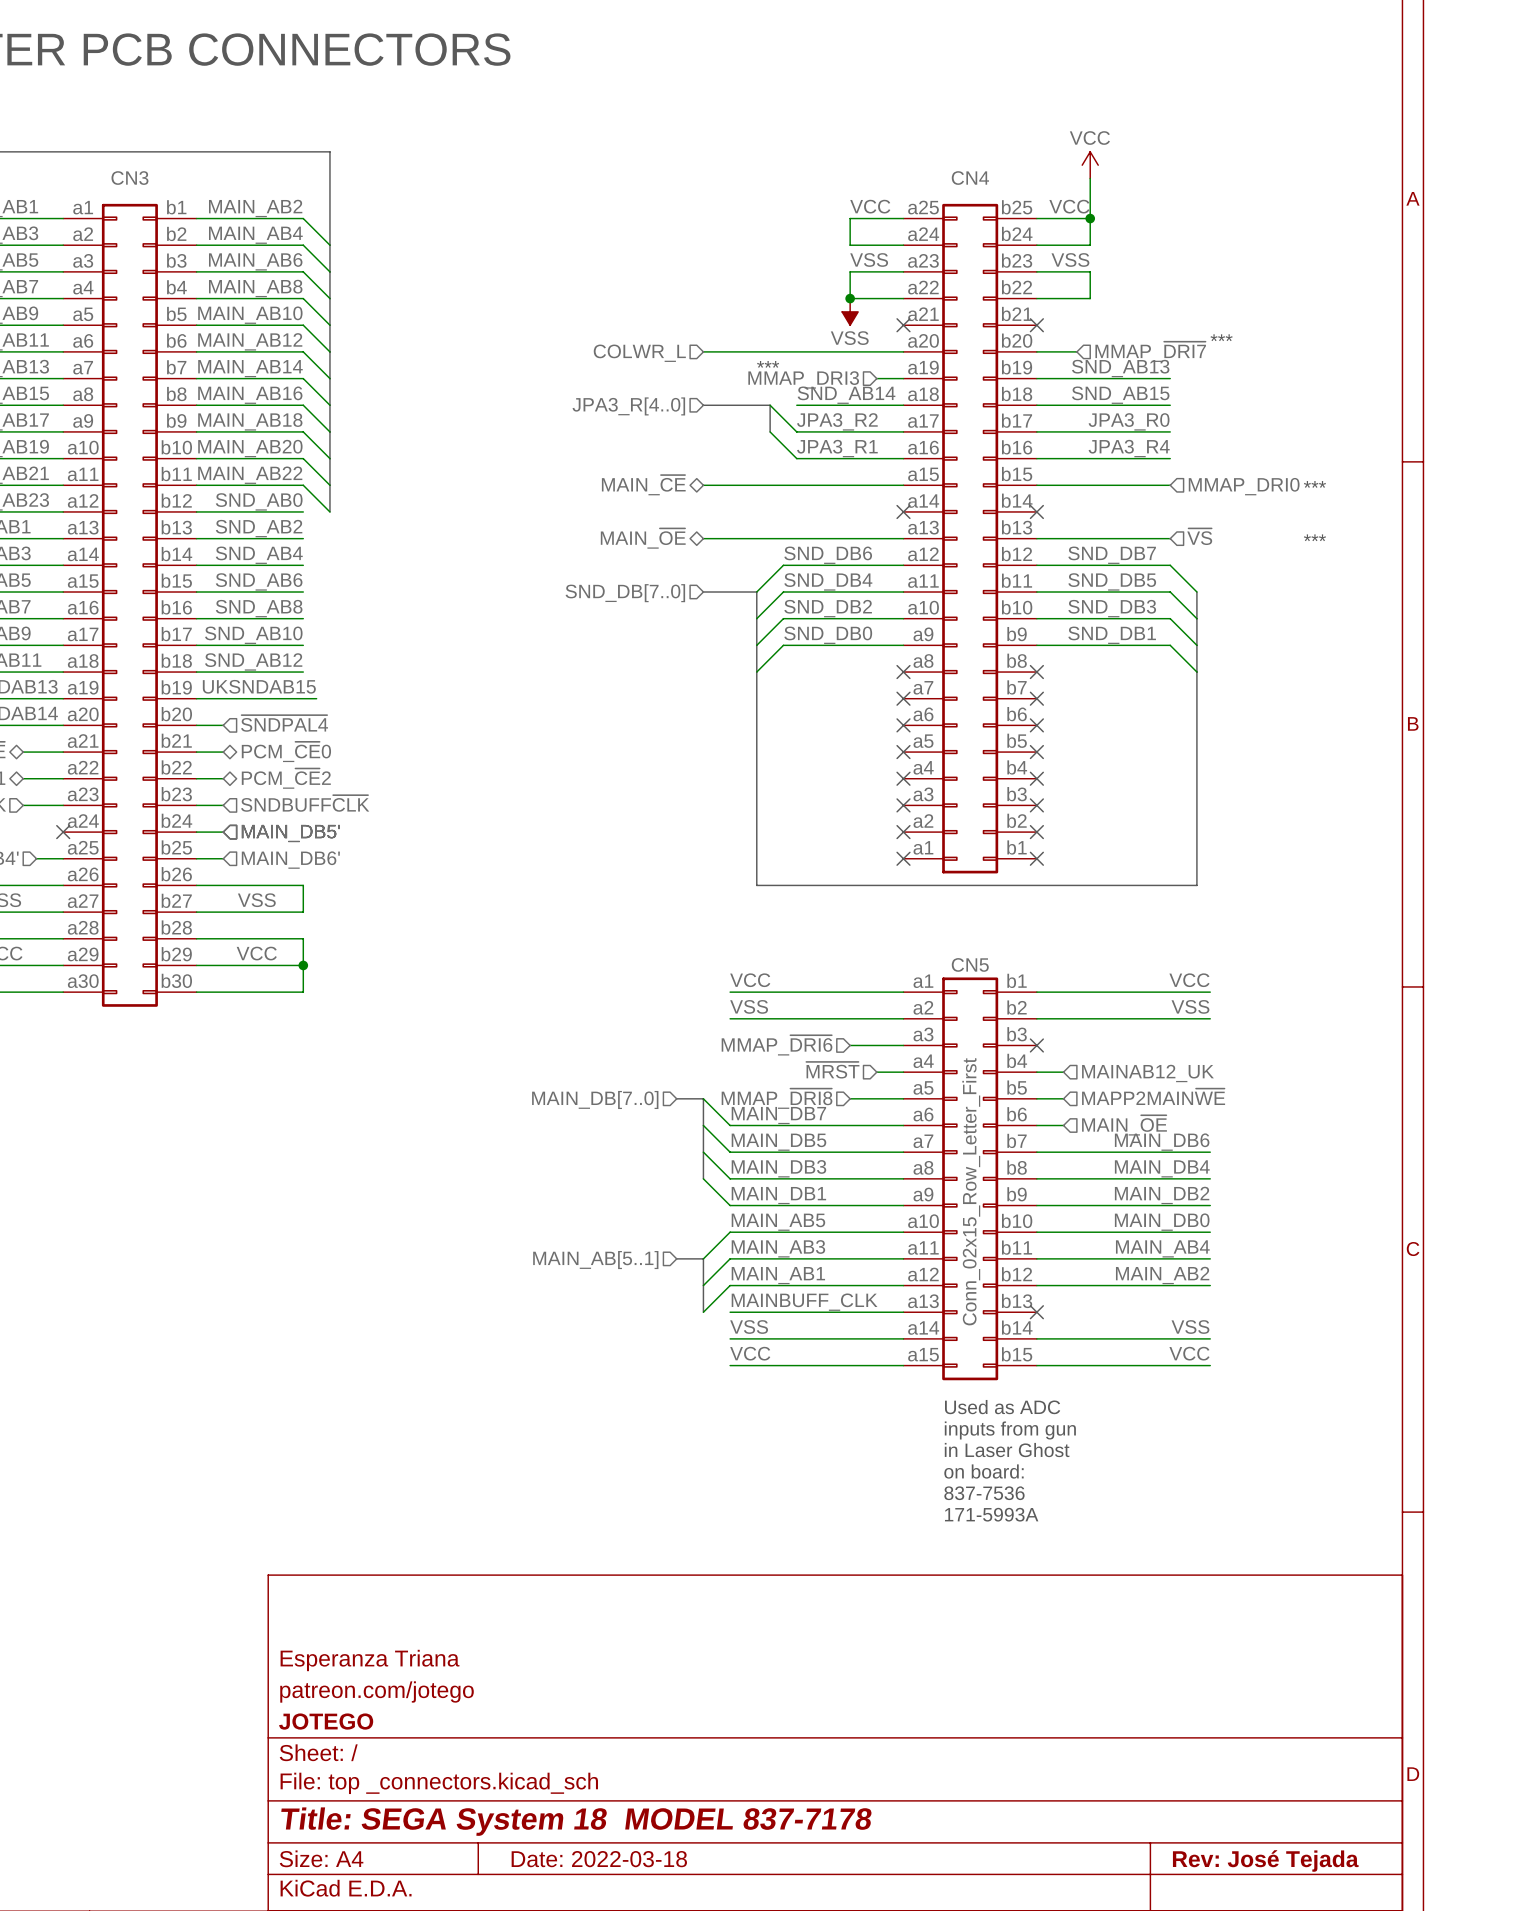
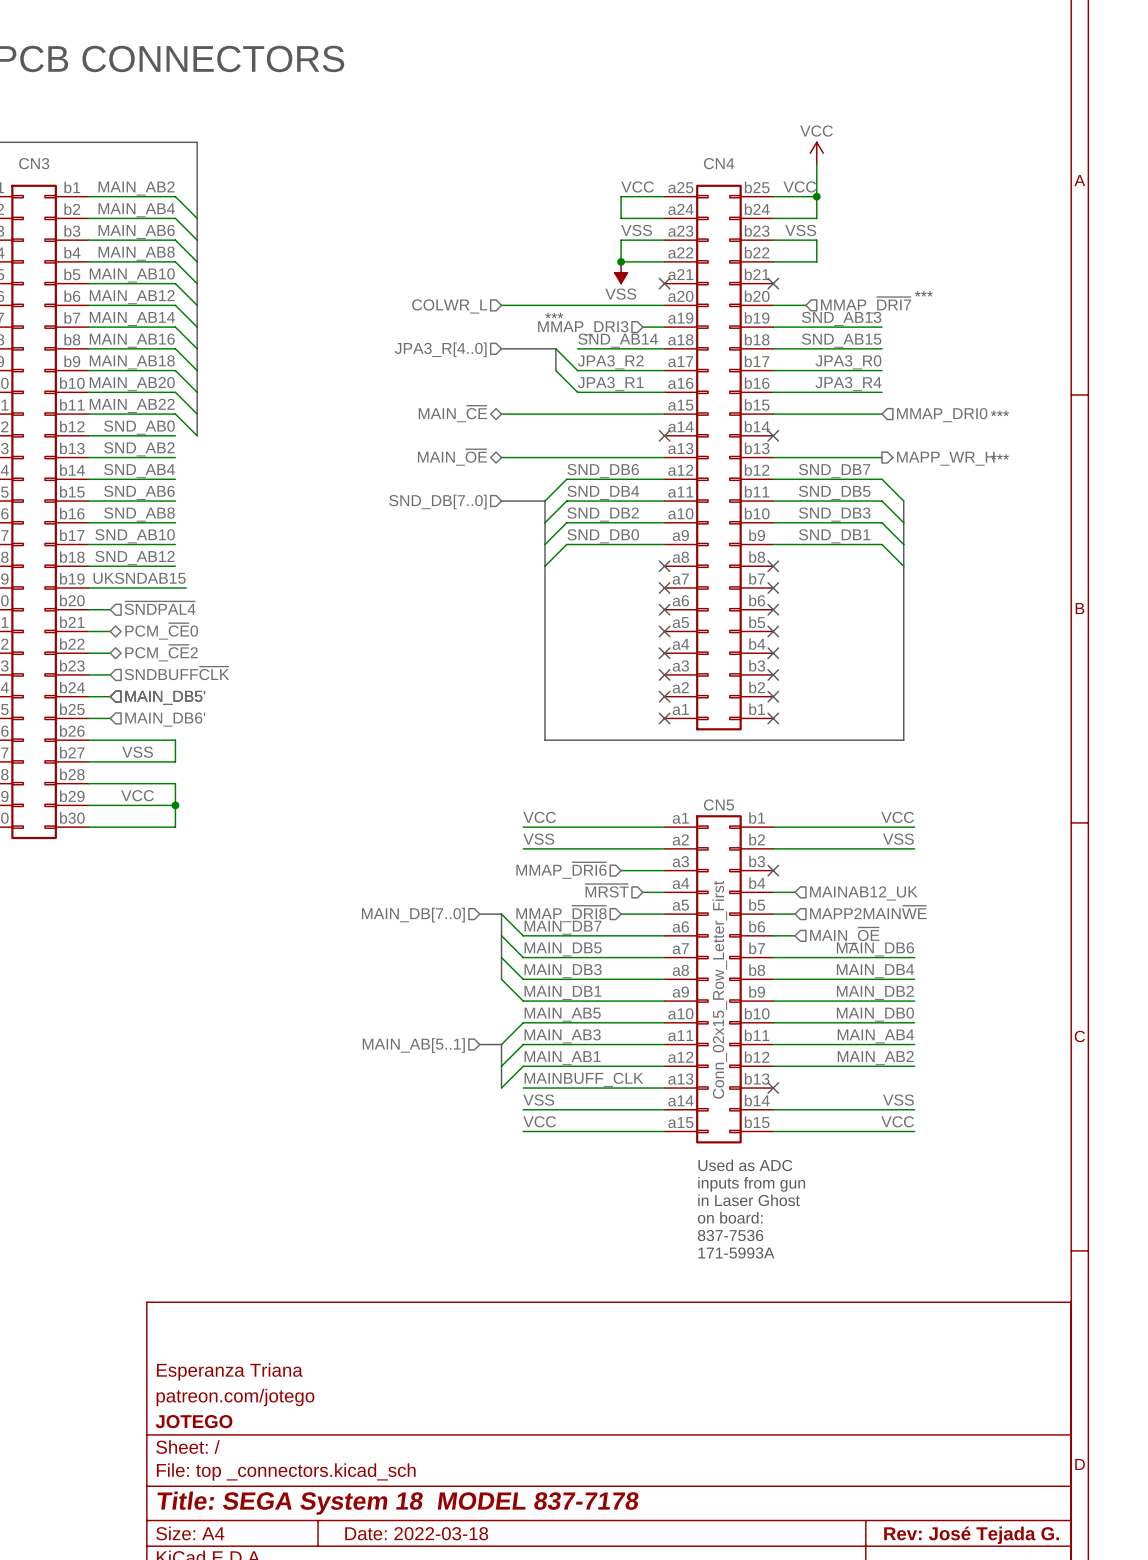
hierarchical label shape: input (1199, 536) -> output (945, 458)
hierarchical label: ~{VS} (1199, 536) -> MAPP_WR_H (945, 458)
title block: Rev: José Tejada (1265, 1860) -> Rev: José Tejada G. (971, 1535)

